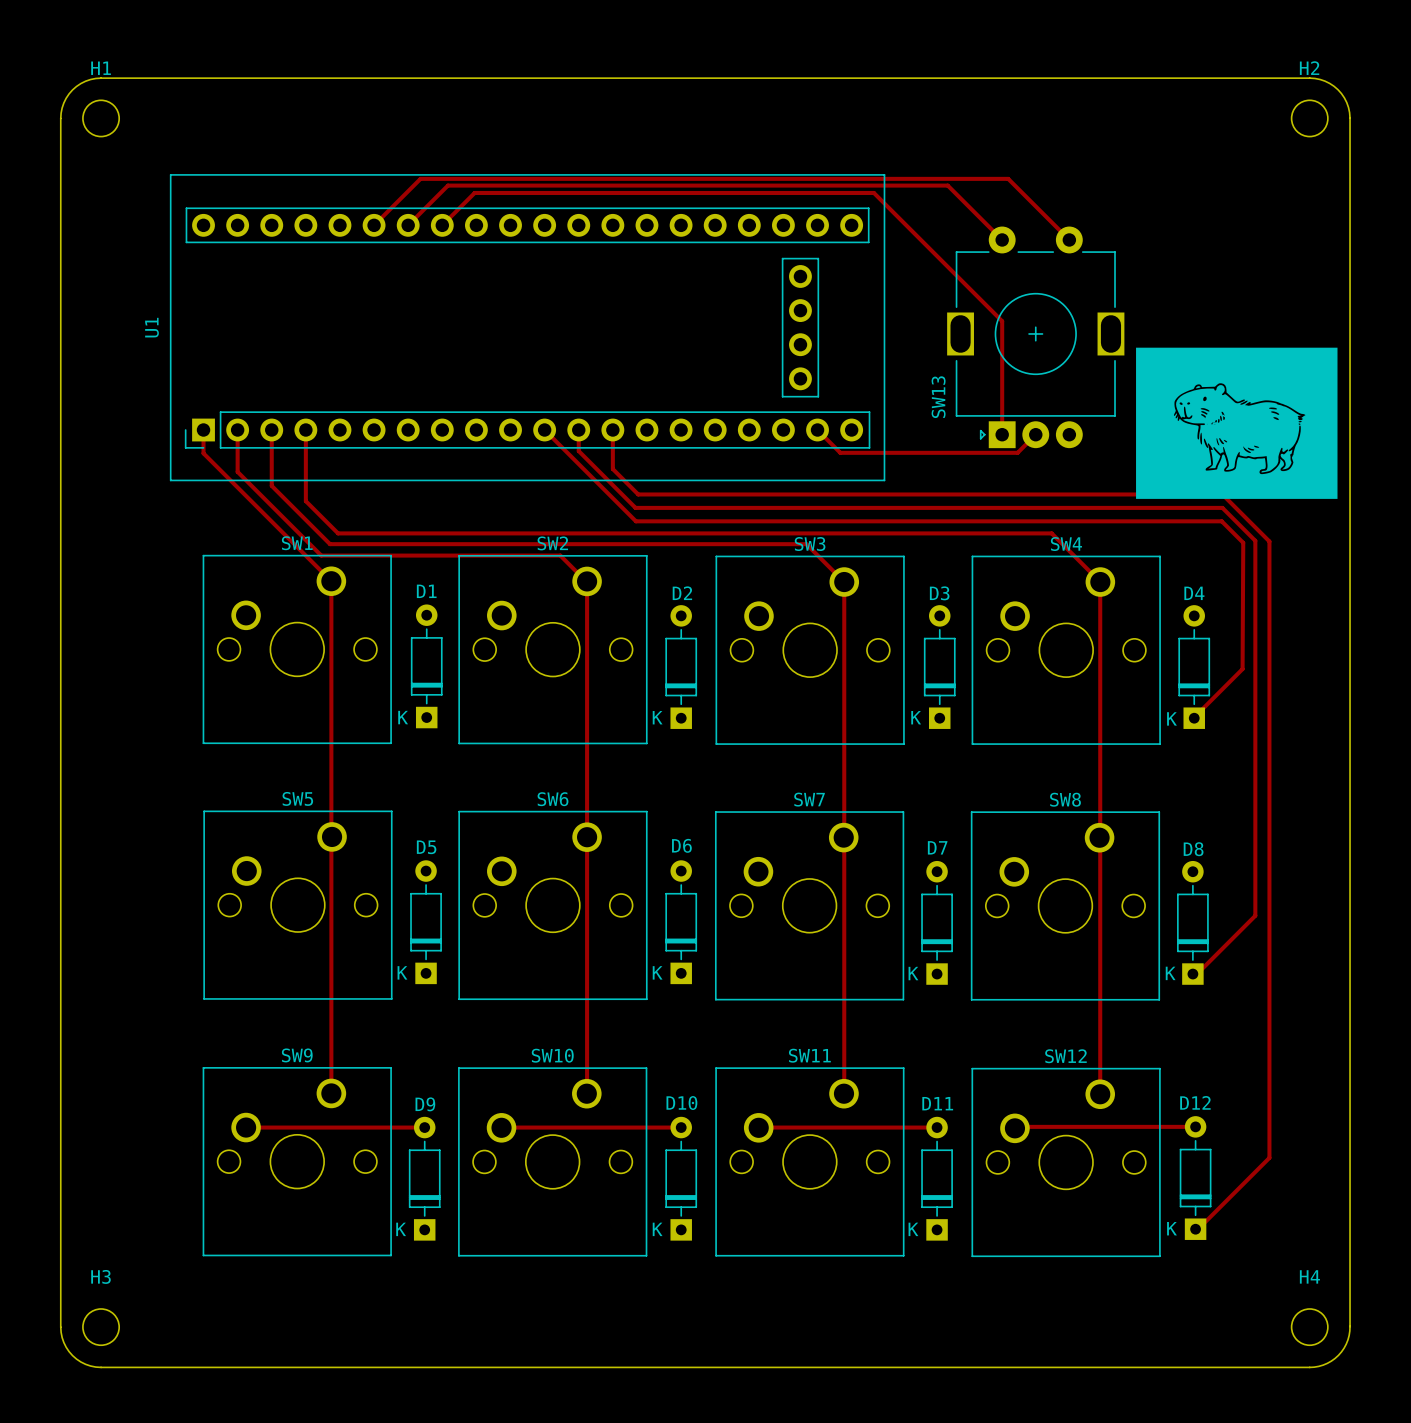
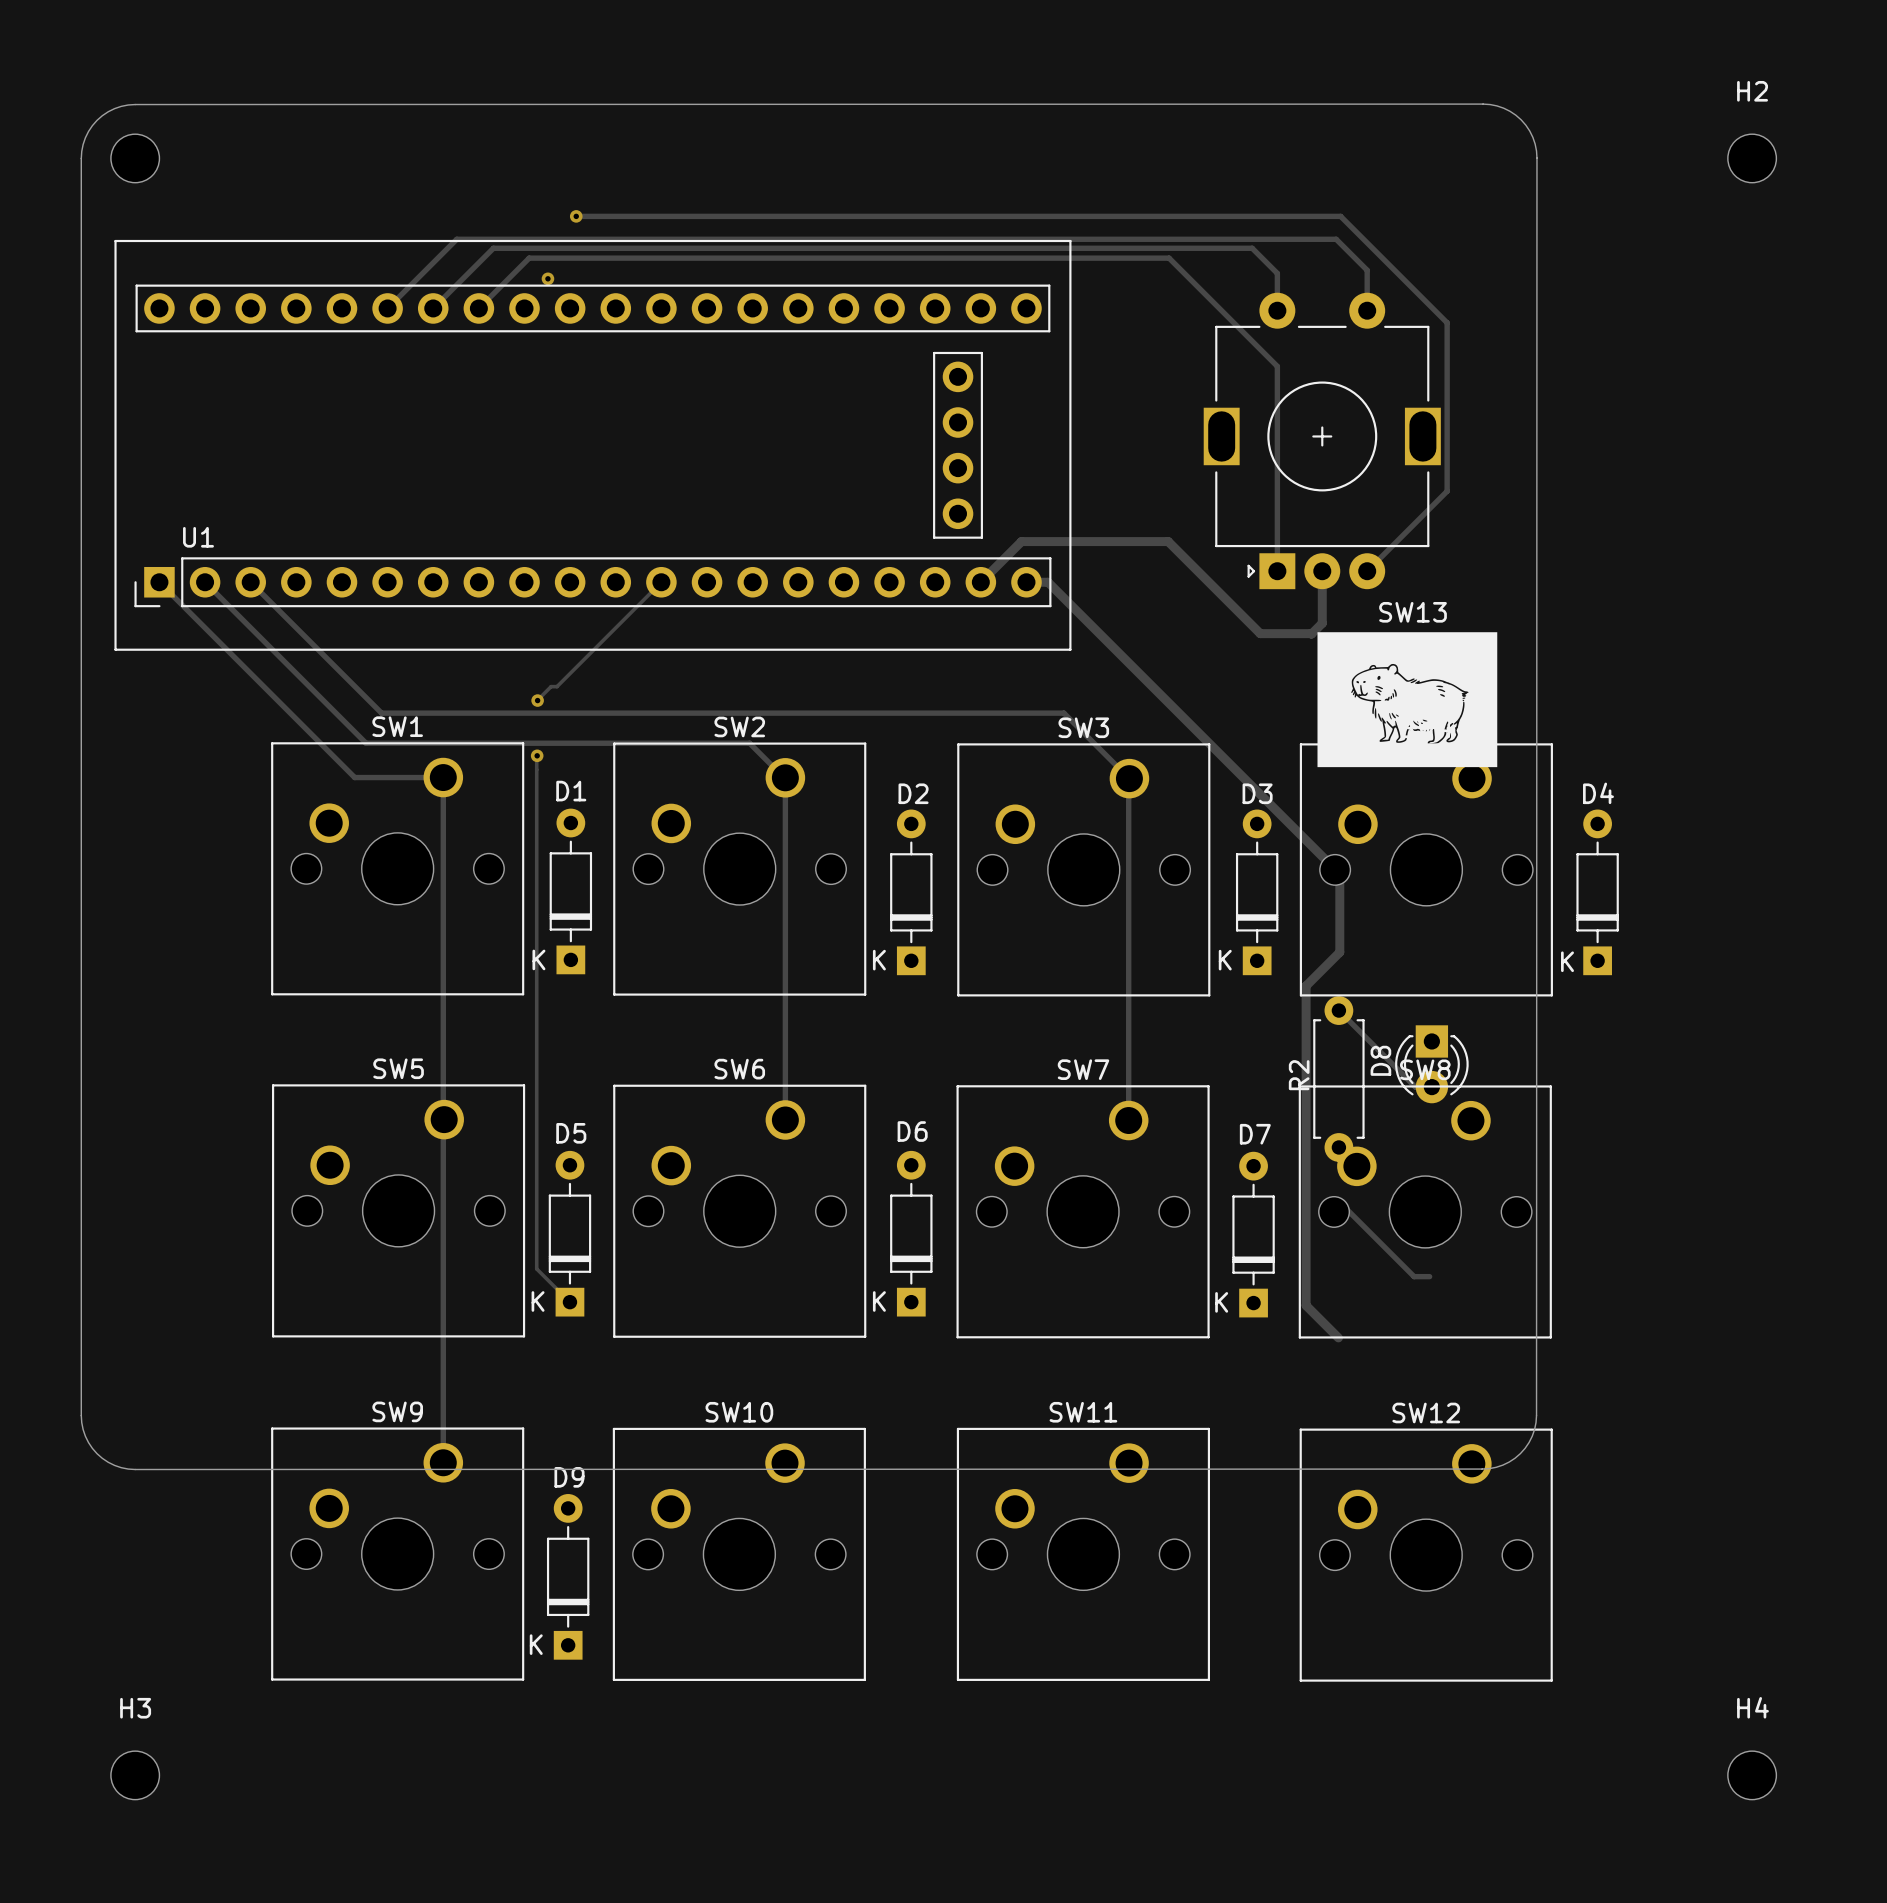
H1 name: H1 (101, 68) -> none
board edge: (101, 78) (1309, 78) (1325, 81) (1337, 89) (1346, 102) (1350, 117) (1349, 1335) (1344, 1348) (1335, 1358) (1323, 1365) (1309, 1367) (90, 1366) (72, 1355) (63, 1342) (61, 1332) (60, 1058) -> (135, 104) (1483, 104) (1503, 108) (1521, 119) (1532, 137) (1536, 157) (1536, 1415) (1532, 1436) (1520, 1453) (1502, 1465) (1482, 1469) (135, 1469) (114, 1465) (97, 1453) (85, 1436) (81, 1415)
track: none -> (576, 216) (1340, 216) (1447, 322) (1447, 491) (1367, 571)
via: none -> (576, 216)
track: (420, 178) (374, 225) -> (562, 239) (456, 239) (387, 308)
track: (998, 178) (1008, 178) (1069, 239) -> (1336, 239) (1367, 270) (1367, 310)
track: (447, 185) (408, 225) -> (599, 248) (493, 248) (433, 308)
track: (936, 185) (947, 185) (1002, 239) -> (1252, 248) (1277, 273) (1277, 310)
track: (474, 192) (442, 225) -> (635, 258) (529, 258) (478, 308)
via: none -> (547, 278)
track: (954, 273) (1002, 321) (1002, 434) -> (1277, 366) (1277, 571)
U1 name rotation: 0° (151, 327) -> 90° clockwise (198, 537)
U1 name position: U1 (151, 327) -> U1 (198, 537)
U1 position: (527, 327) -> (592, 445)
SW13 position: (1035, 337) -> (1322, 440)
SW13 name rotation: 0° (938, 397) -> 90° clockwise (1413, 612)
SW13 name position: SW13 (938, 397) -> SW13 (1413, 612)
part: (1236, 423) -> none
track: none -> (1322, 571) (1322, 623) (1311, 634) (1260, 633) (1168, 541) (1021, 541) (980, 582)
track: (203, 430) (203, 453) (331, 581) -> (159, 582) (354, 777) (443, 777)
track: (237, 430) (237, 471) (321, 555) -> (205, 582) (366, 743) (429, 743)
track: (271, 430) (271, 485) (330, 544) (806, 544) -> (250, 582) (381, 713) (1063, 713) (1078, 727)
track: (305, 430) (305, 501) (338, 533) (1051, 533) (1100, 582) -> none
track: (544, 430) (635, 521) (1221, 521) (1243, 542) (1242, 669) (1194, 718) -> none
track: (578, 430) (578, 451) (635, 507) (1222, 507) (1255, 540) (1255, 915) (1197, 974) (1192, 974) -> none
track: (612, 430) (612, 469) (638, 494) (1222, 494) (1269, 541) (1269, 1157) (1198, 1229) (1195, 1229) -> none
track: (817, 430) (840, 452) (1017, 452) (1035, 434) -> none
track: none -> (661, 582) (557, 686) (551, 686) (537, 700)
track: none -> (1026, 582) (1048, 582) (1339, 873) (1339, 952) (1306, 985) (1306, 1305) (1338, 1337)
drawing: none -> [1317, 632, 1498, 768]
via: none -> (537, 700)
track: none -> (537, 755) (536, 1268) (569, 1302)
via: none -> (537, 755)
track: (1100, 582) (1100, 1094) -> none
track: (844, 583) (843, 1093) -> (1129, 781) (1128, 1120)
track: none -> (1338, 1010) (1415, 1087) (1431, 1087)
R2: none -> (1338, 1079)
track: (587, 837) (586, 1093) -> none
D8 name position: D8 (1193, 849) -> D8 (1380, 1060)
D8 footprint: [1177, 860, 1209, 985] -> [1395, 1025, 1469, 1104]
track: none -> (1338, 1201) (1414, 1276) (1429, 1276)
track: (1195, 1126) (1014, 1128) -> none
track: (246, 1127) (424, 1127) -> none
track: (681, 1127) (501, 1127) -> none
track: (937, 1127) (758, 1127) -> none
D10: (681, 1178) -> none
D11: (937, 1178) -> none
D12: (1195, 1178) -> none

